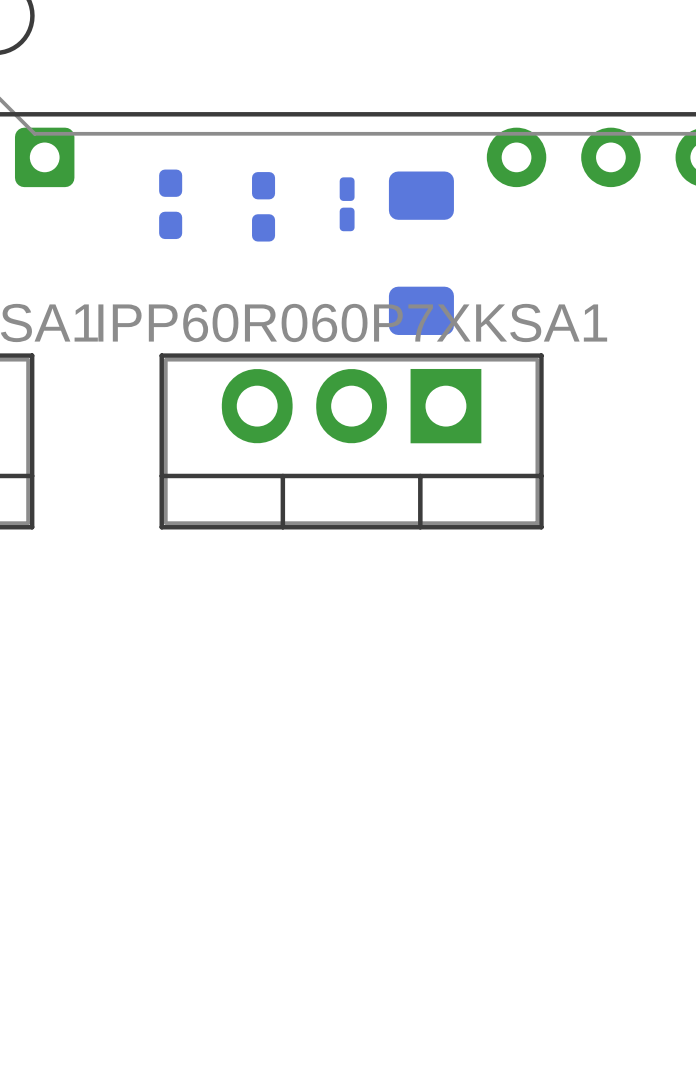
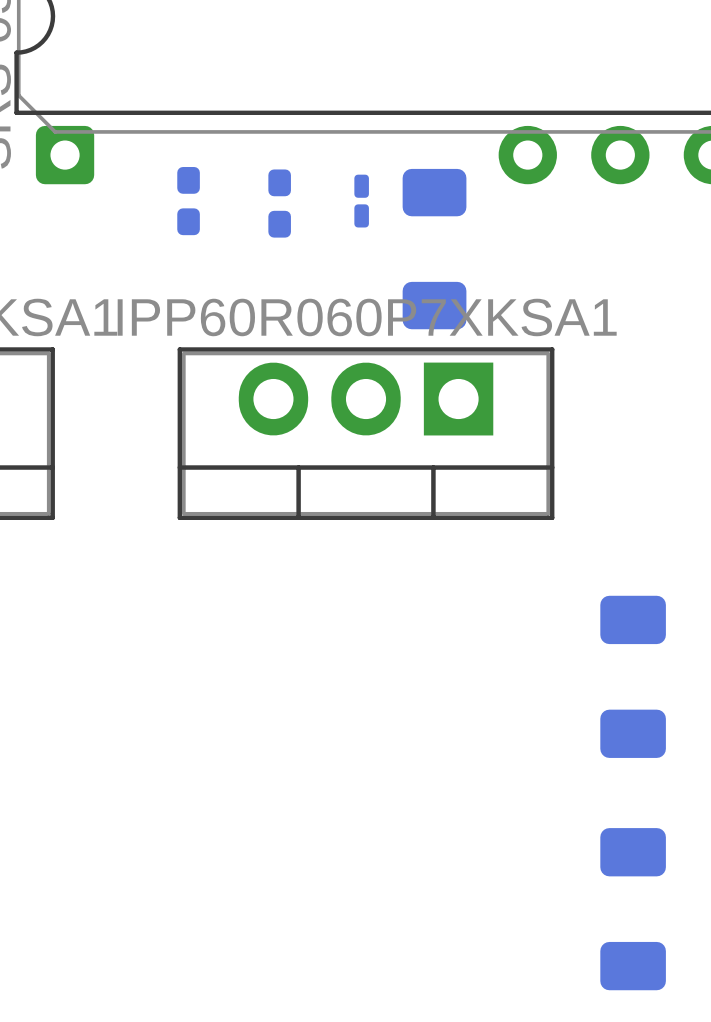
part: none -> (633, 676)
part: none -> (633, 909)

